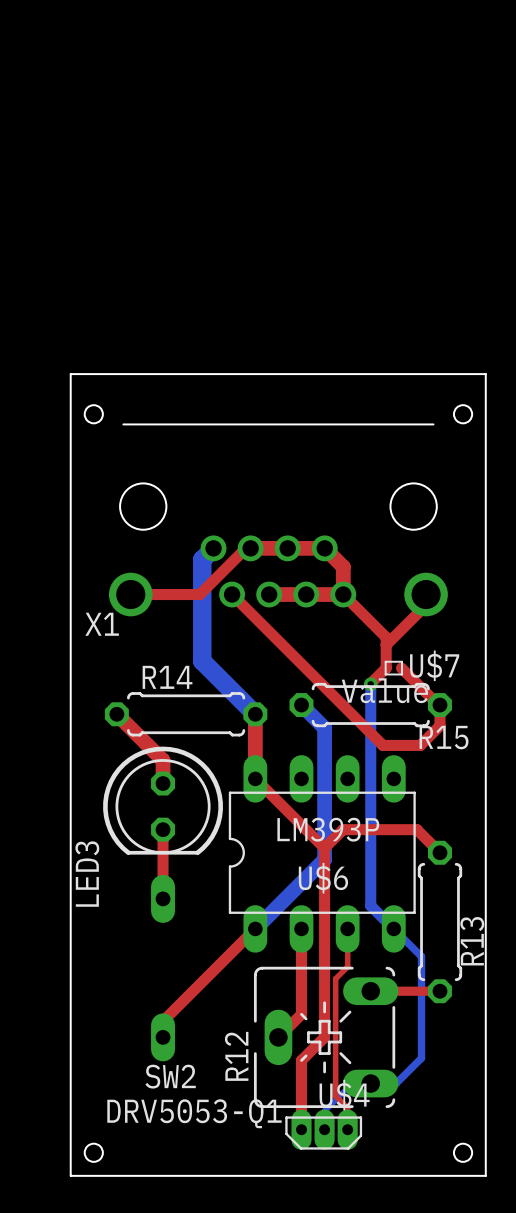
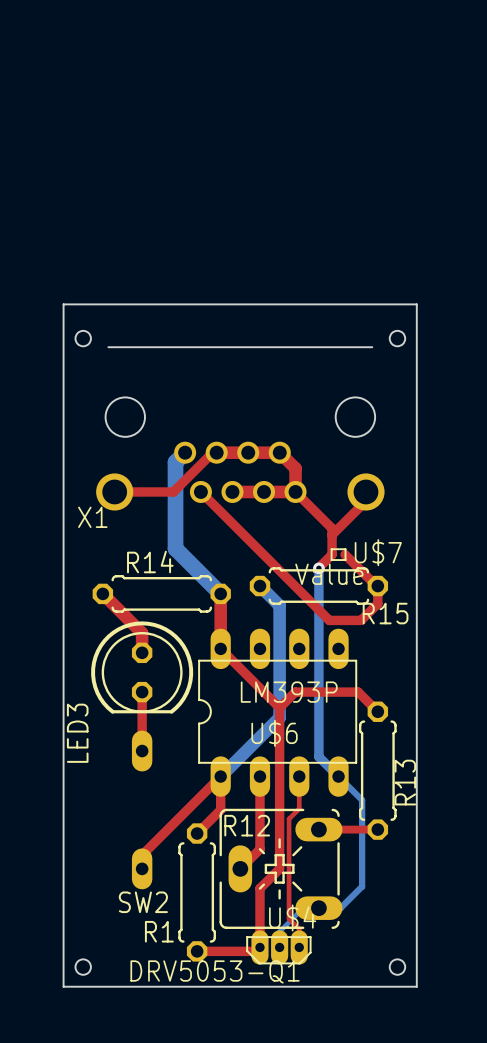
top track: none -> (220, 776) (220, 809) (197, 833)
R12 name rotation: 0° (236, 1056) -> 90° clockwise (247, 825)
R12 name position: R12 (236, 1056) -> R12 (247, 825)
R1: none -> (197, 892)
U$4 value position: DRV5053-Q1 (194, 1113) -> DRV5053-Q1 (215, 971)
top track: none -> (259, 947) (256, 951) (197, 951)

